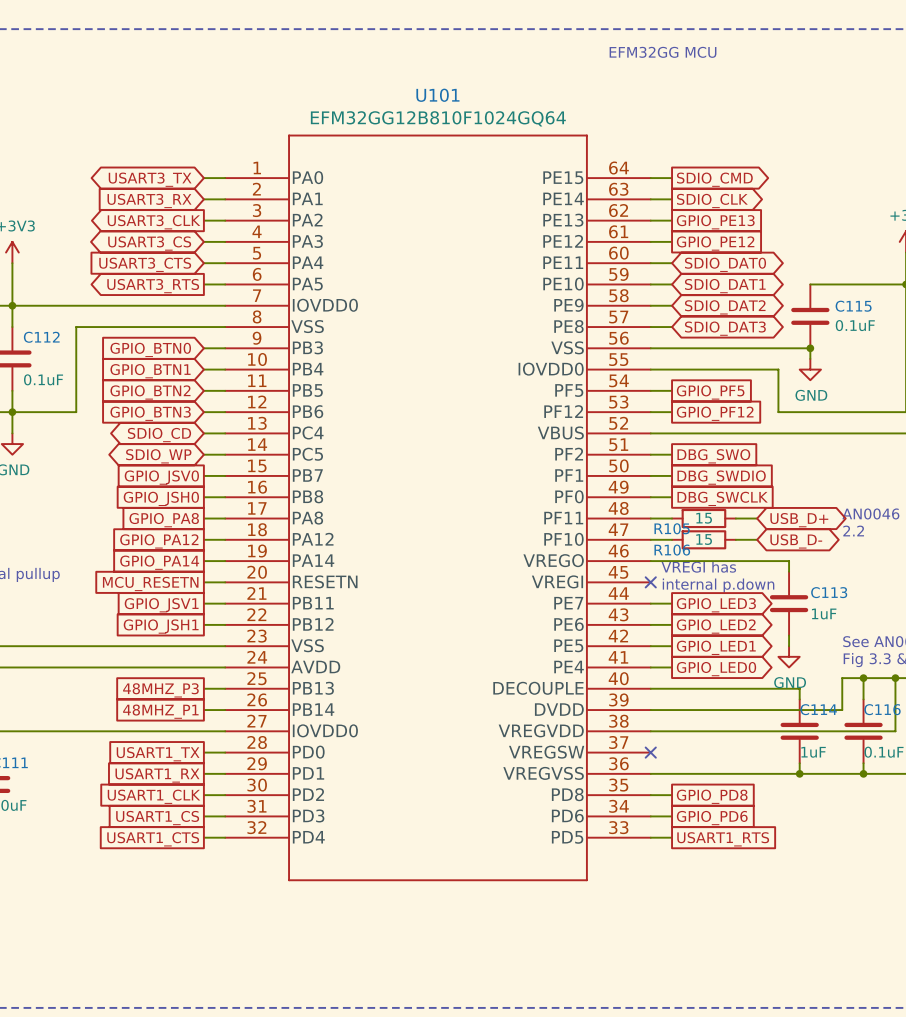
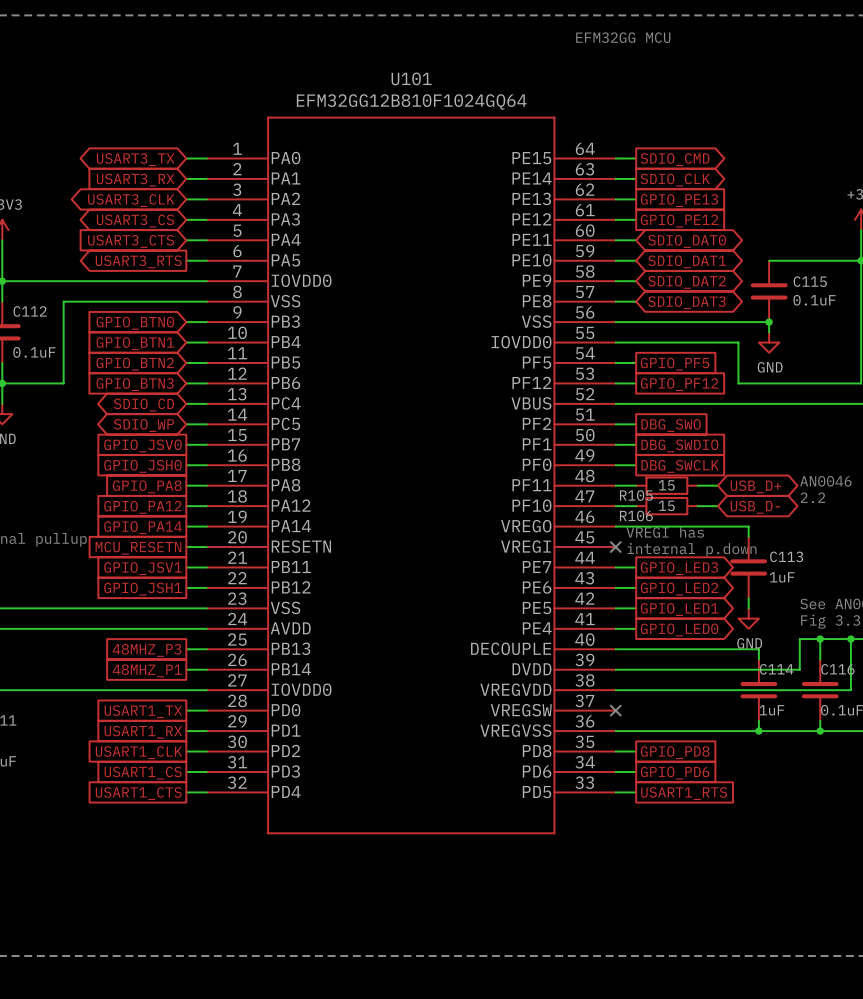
global label shape: output (153, 222) -> bidirectional (131, 200)

